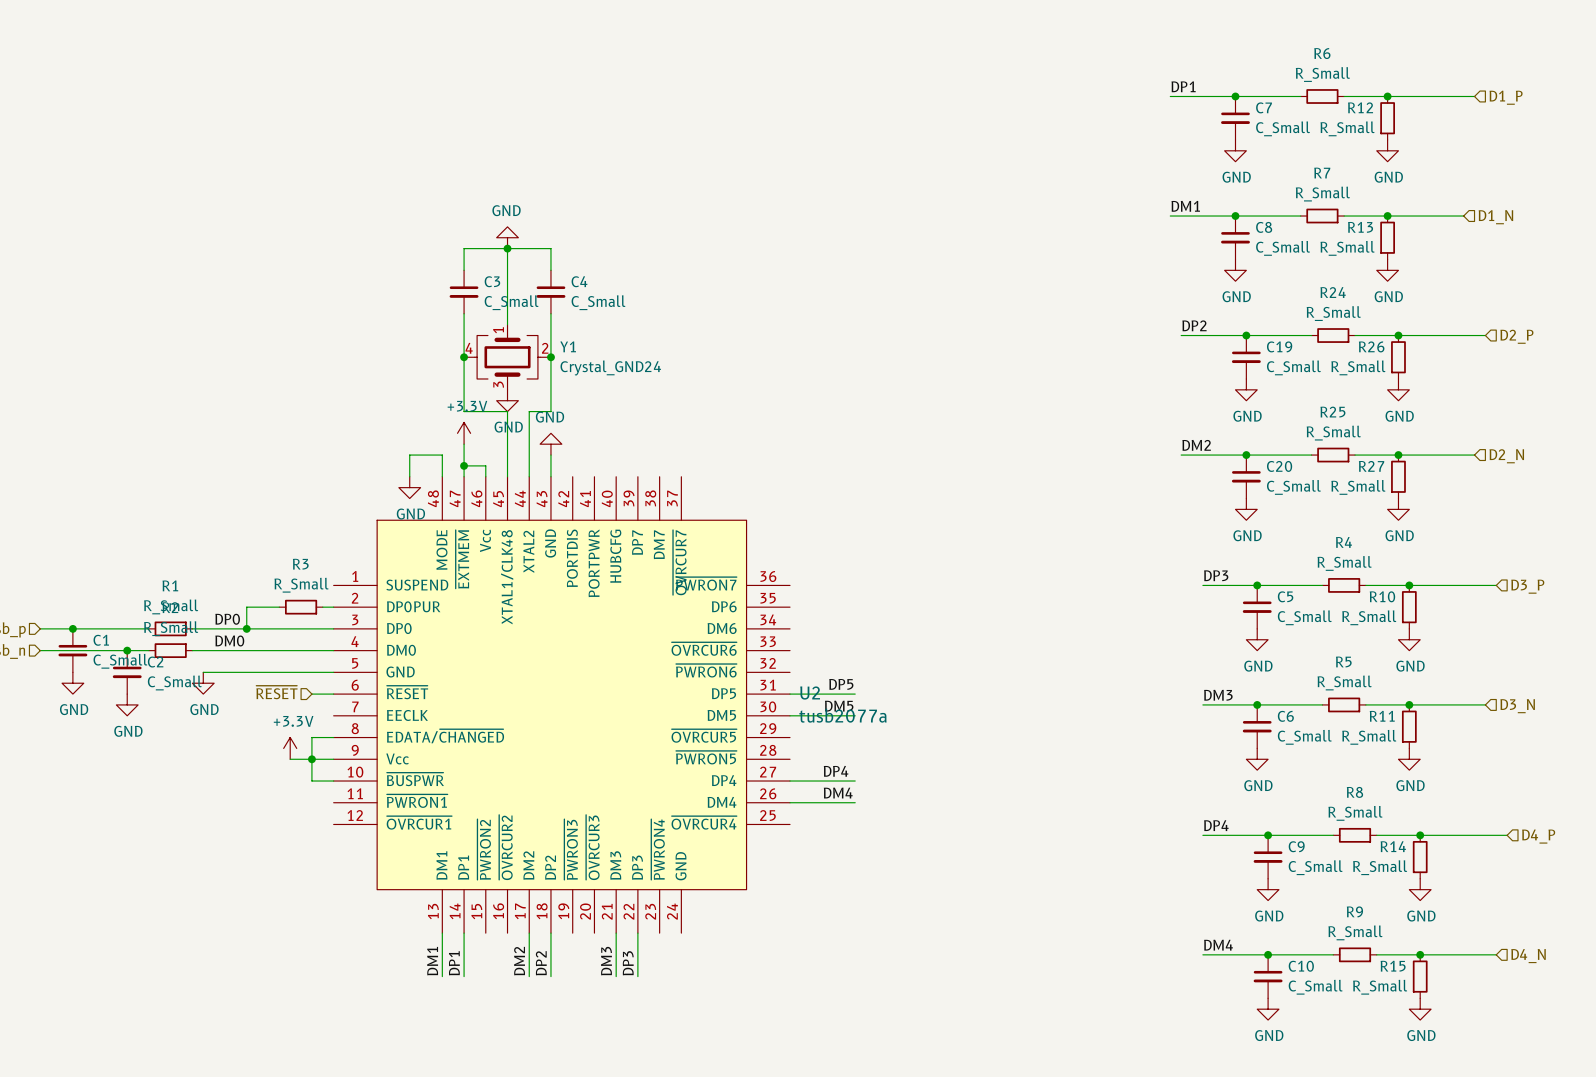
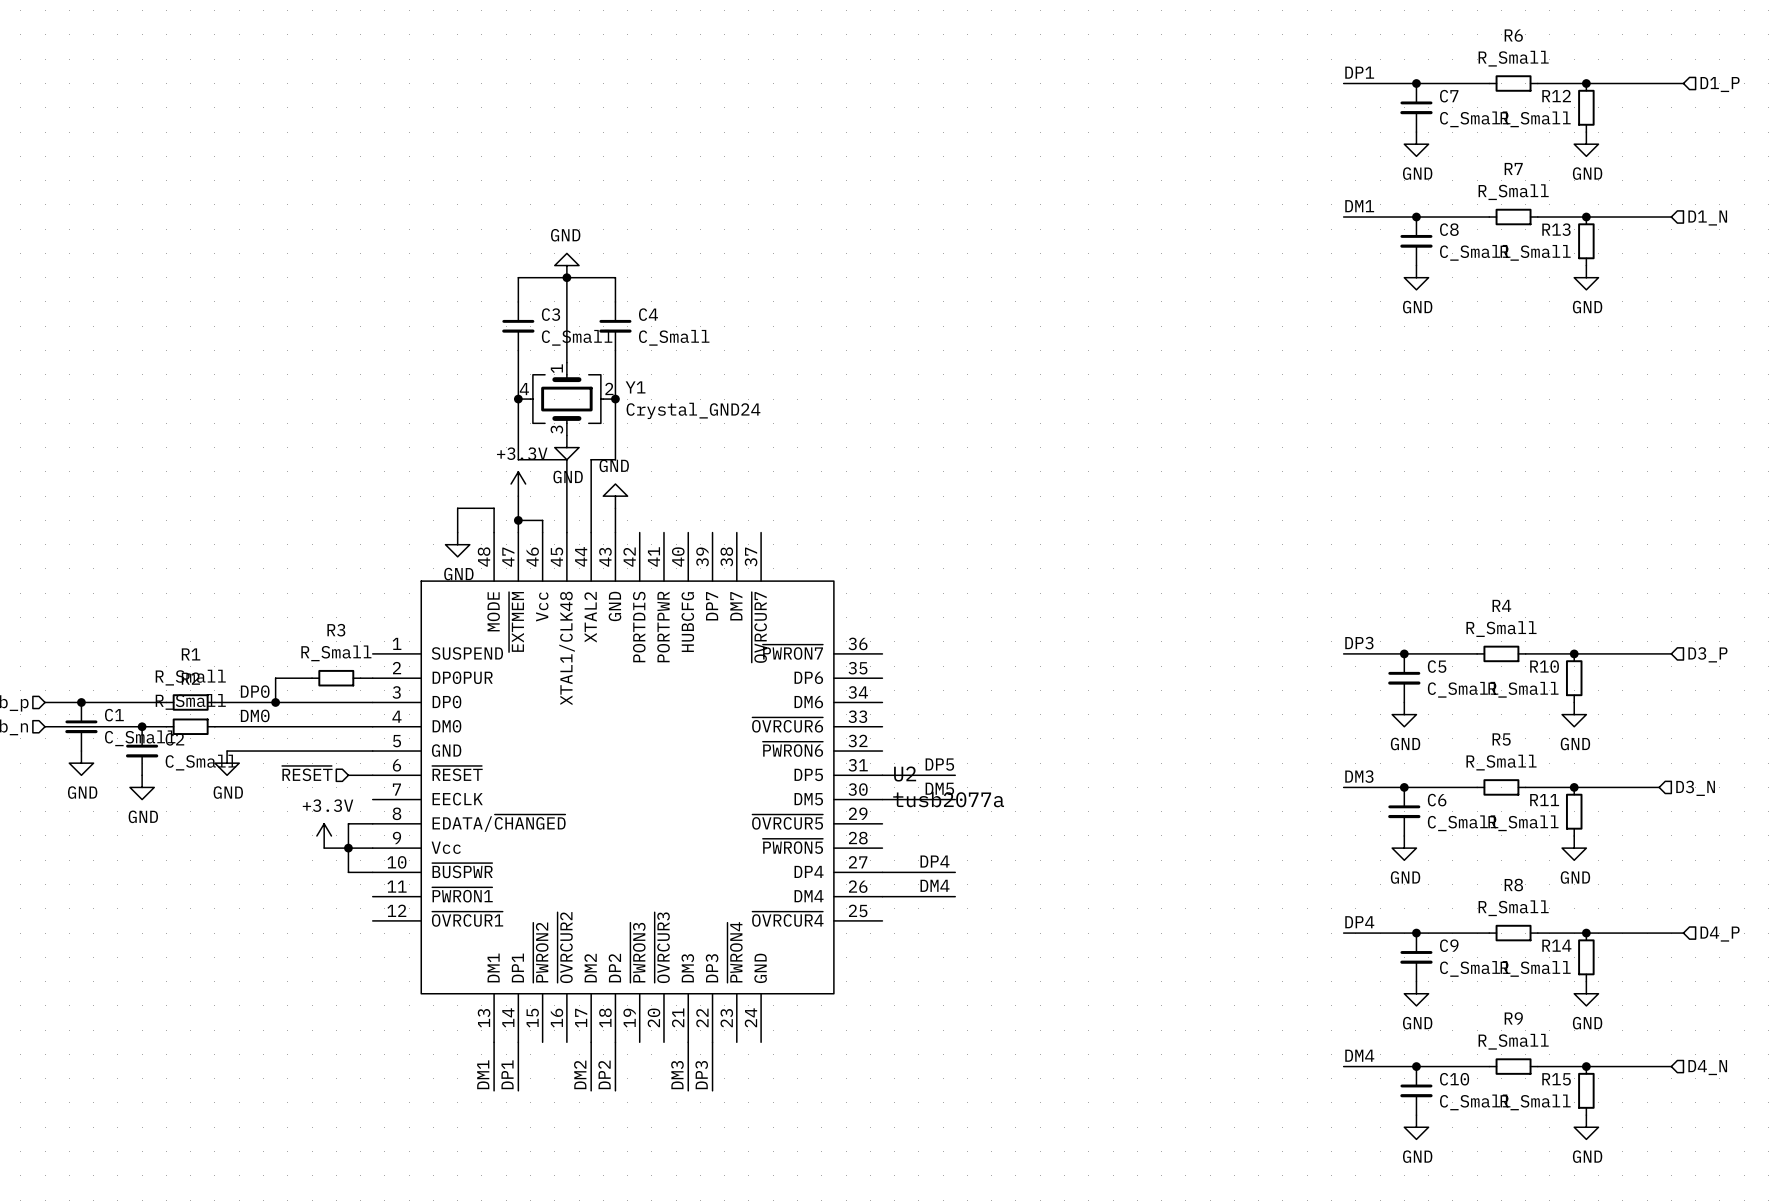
label position: DP1 (1183, 86) -> DP1 (1359, 72)
wire: (1170, 96) (1300, 96) -> (1343, 83) (1489, 83)
junction position: (1235, 96) -> (1416, 83)
R6 position: (1322, 96) -> (1513, 83)
wire: (1344, 96) (1474, 96) -> (1537, 83) (1683, 83)
junction position: (1387, 96) -> (1586, 83)
hierarchical label position: D1_P (1506, 97) -> D1_P (1720, 84)
C7 position: (1235, 118) -> (1416, 107)
R12 position: (1387, 118) -> (1586, 107)
power symbol position: GND (1235, 150) -> GND (1416, 144)
power symbol position: GND (1387, 150) -> GND (1586, 144)
label position: DM1 (1185, 206) -> DM1 (1359, 206)
wire: (1170, 216) (1300, 216) -> (1343, 217) (1489, 217)
junction position: (1235, 216) -> (1416, 217)
R7 position: (1322, 216) -> (1513, 217)
wire: (1344, 216) (1463, 216) -> (1537, 217) (1671, 217)
junction position: (1387, 216) -> (1586, 217)
hierarchical label position: D1_N (1495, 217) -> D1_N (1707, 218)
C8 position: (1235, 237) -> (1416, 241)
R13 position: (1387, 237) -> (1586, 241)
power symbol position: GND (1235, 270) -> GND (1416, 277)
power symbol position: GND (1387, 270) -> GND (1586, 277)
label: DP2 (1194, 325) -> none
wire: (1181, 335) (1311, 335) -> none
junction: (1246, 335) -> none
R24: R_Small (1333, 335) -> none
wire: (1355, 335) (1485, 335) -> none
junction: (1398, 335) -> none
hierarchical label: D2_P (1516, 336) -> none
C19: C_Small (1246, 357) -> none
R26: R_Small (1398, 357) -> none
power symbol: GND (1246, 389) -> none
power symbol: GND (1398, 389) -> none
label: DM2 (1196, 445) -> none
wire: (1181, 455) (1311, 455) -> none
junction: (1246, 455) -> none
R25: R_Small (1333, 455) -> none
wire: (1355, 455) (1474, 455) -> none
junction: (1398, 455) -> none
hierarchical label: D2_N (1506, 456) -> none
C20: C_Small (1246, 476) -> none
R27: R_Small (1398, 476) -> none
power symbol: GND (1246, 509) -> none
power symbol: GND (1398, 509) -> none

